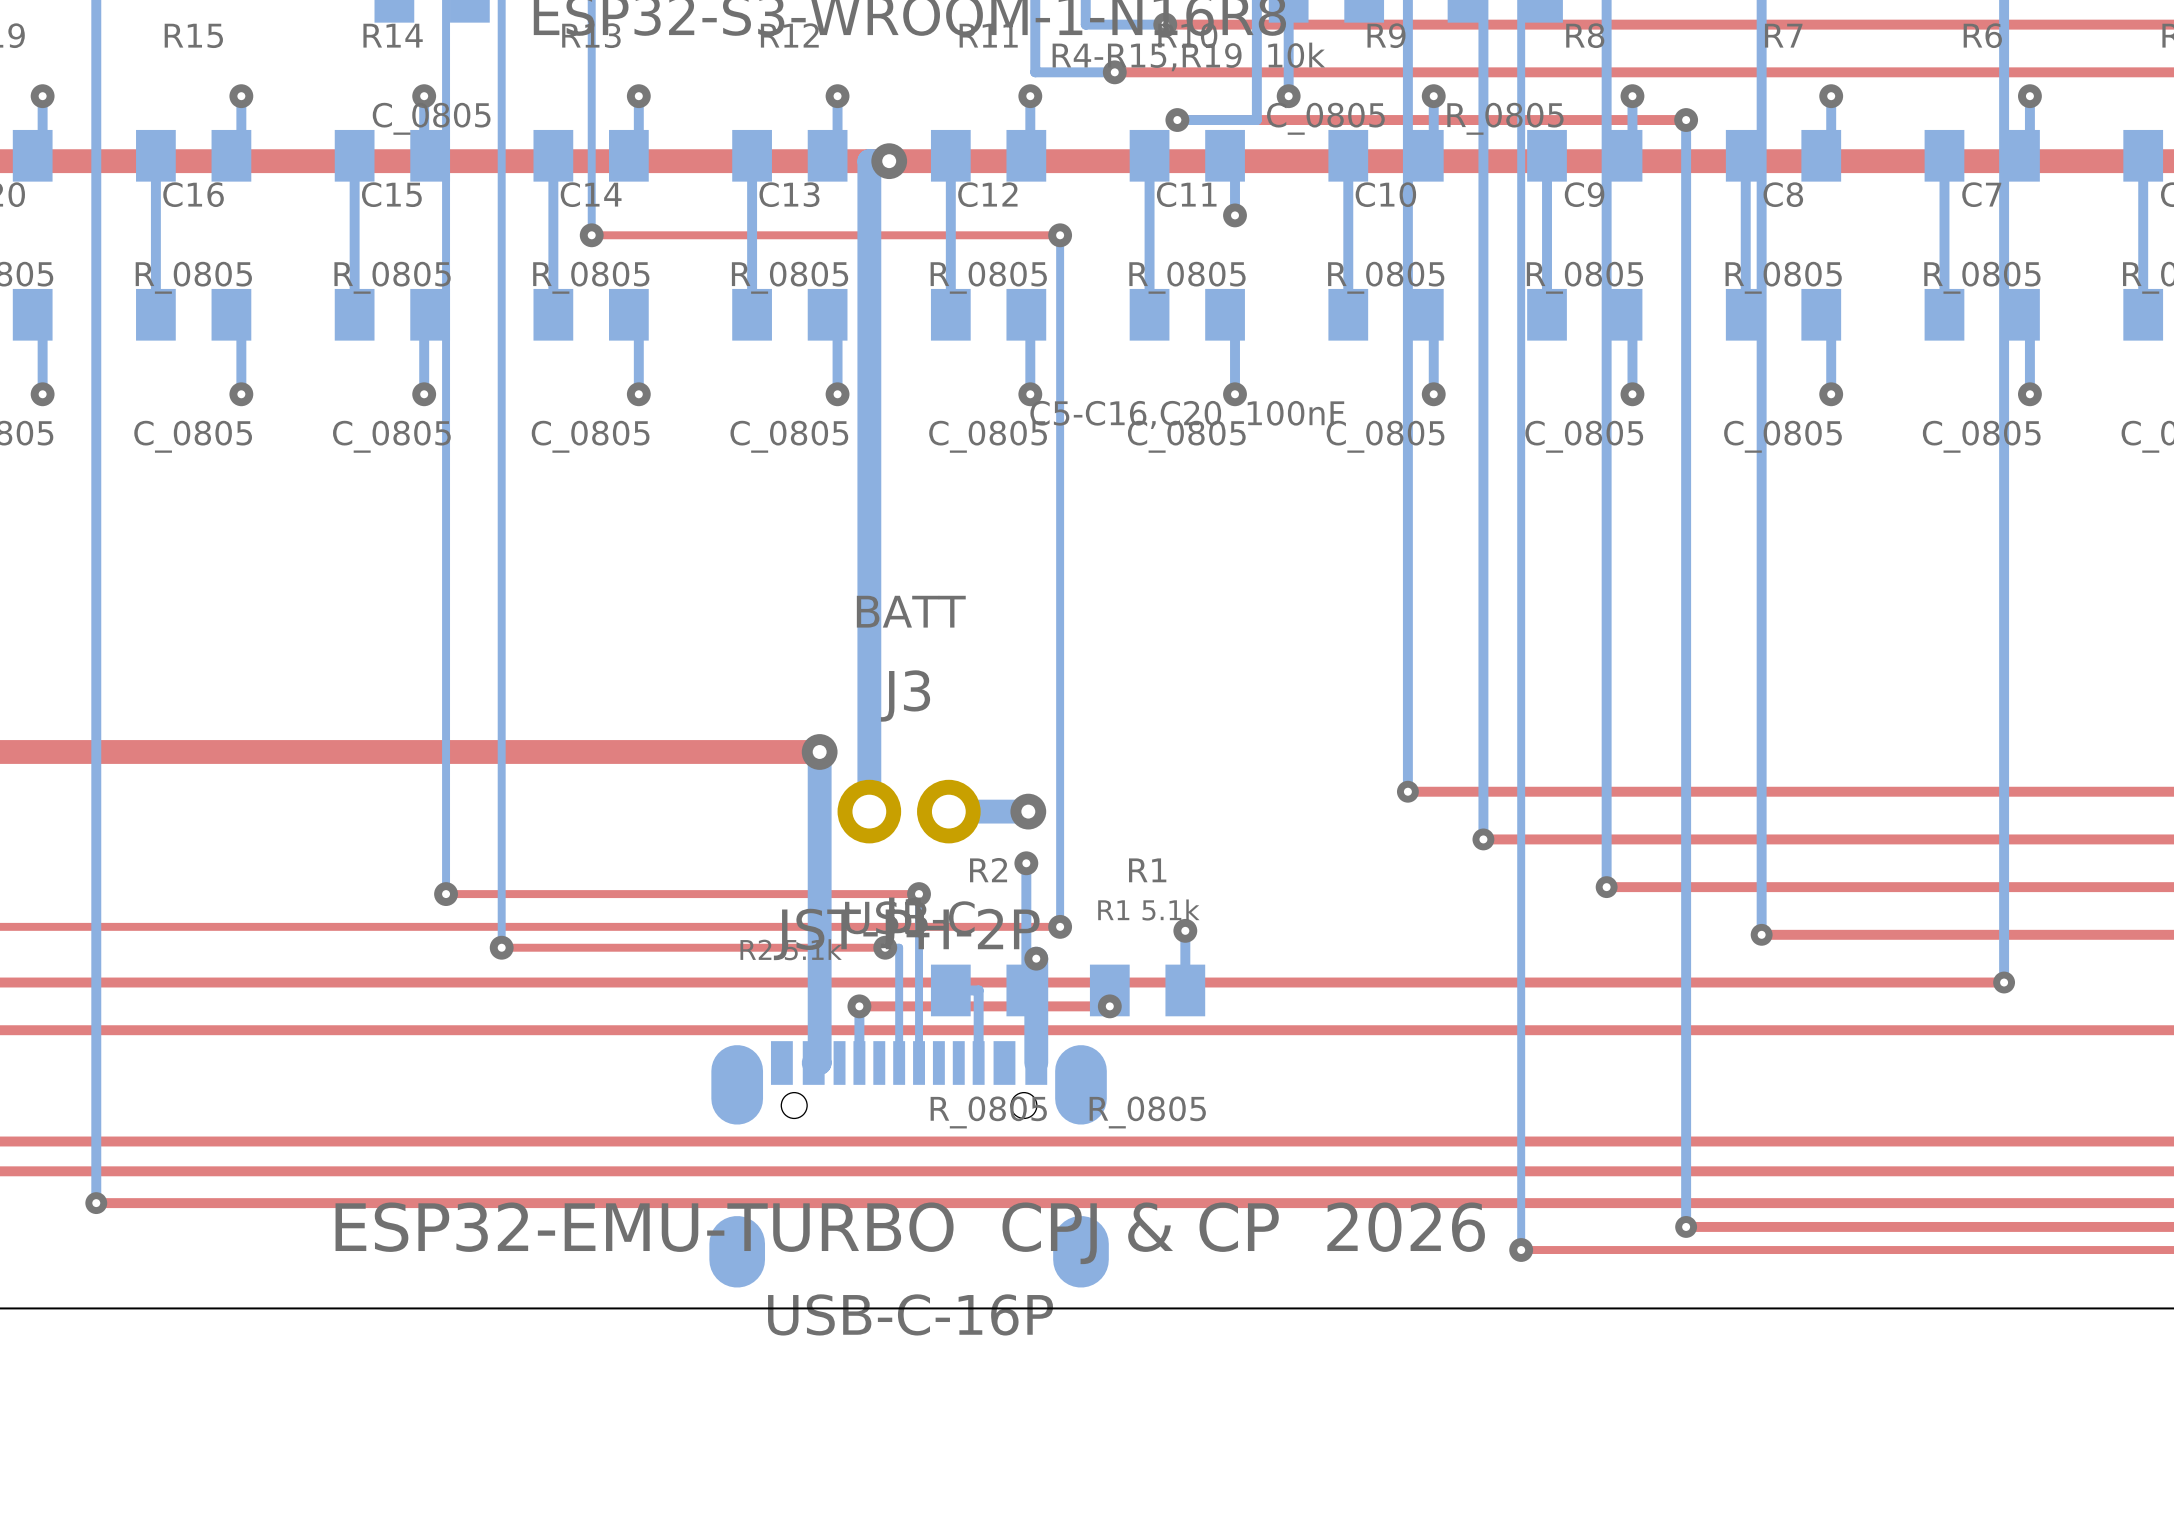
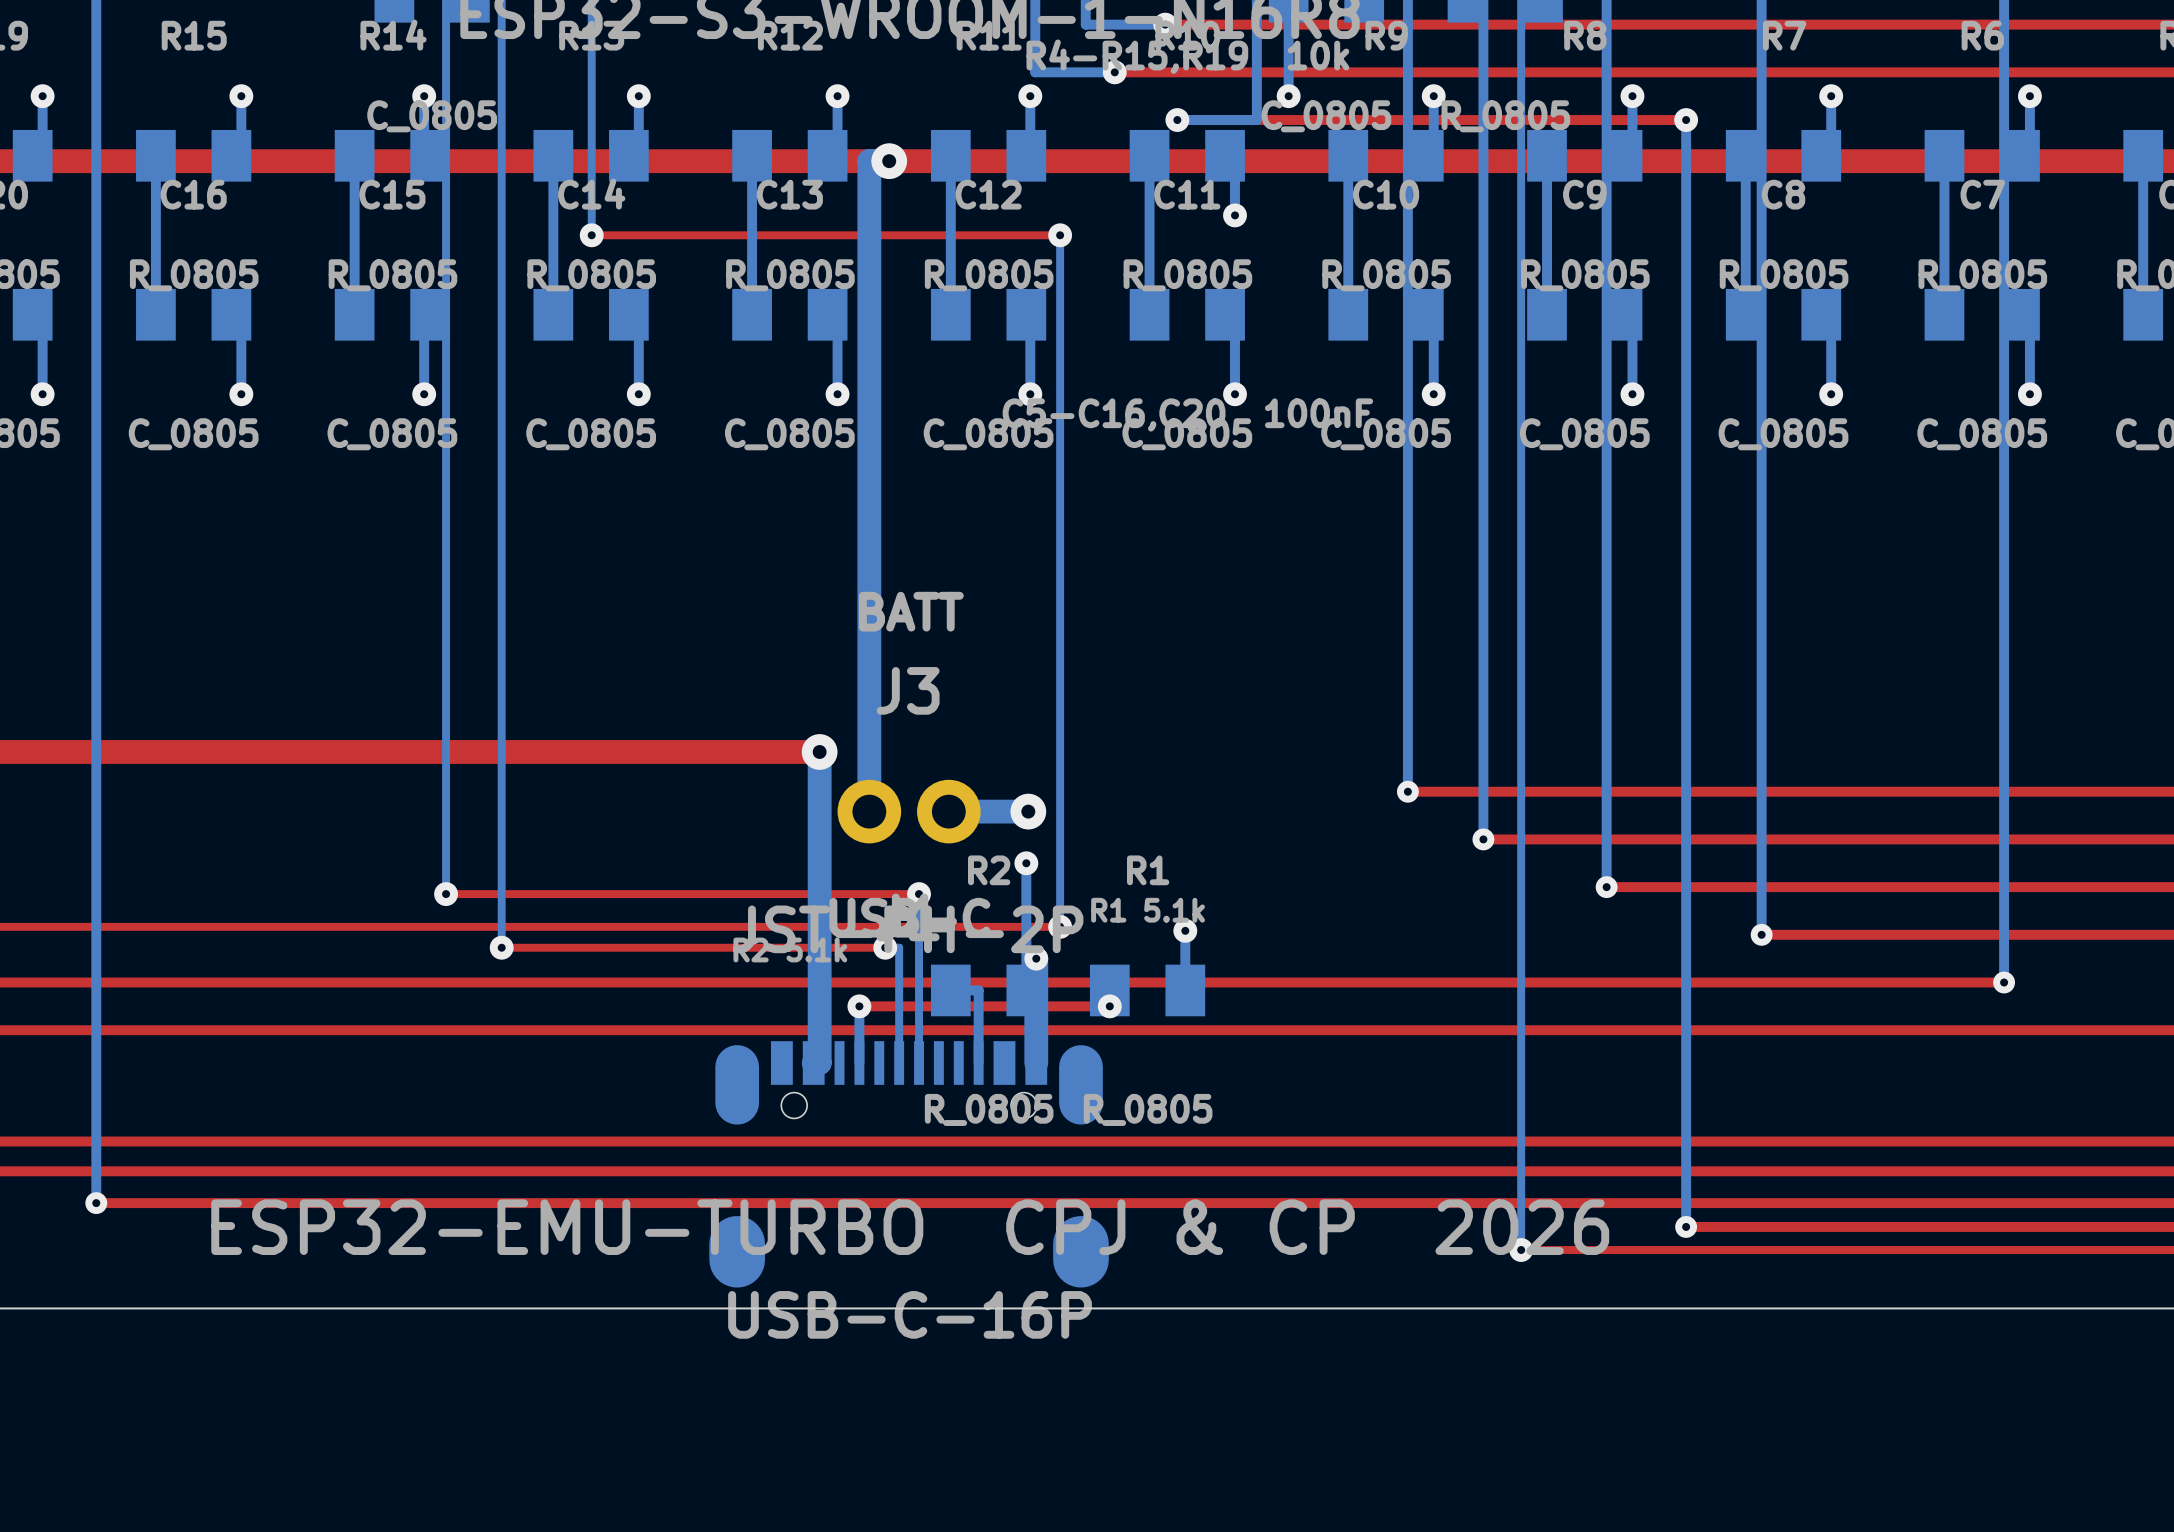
part footprint: [709, 1041, 1109, 1288] -> [709, 1041, 1109, 1288]

